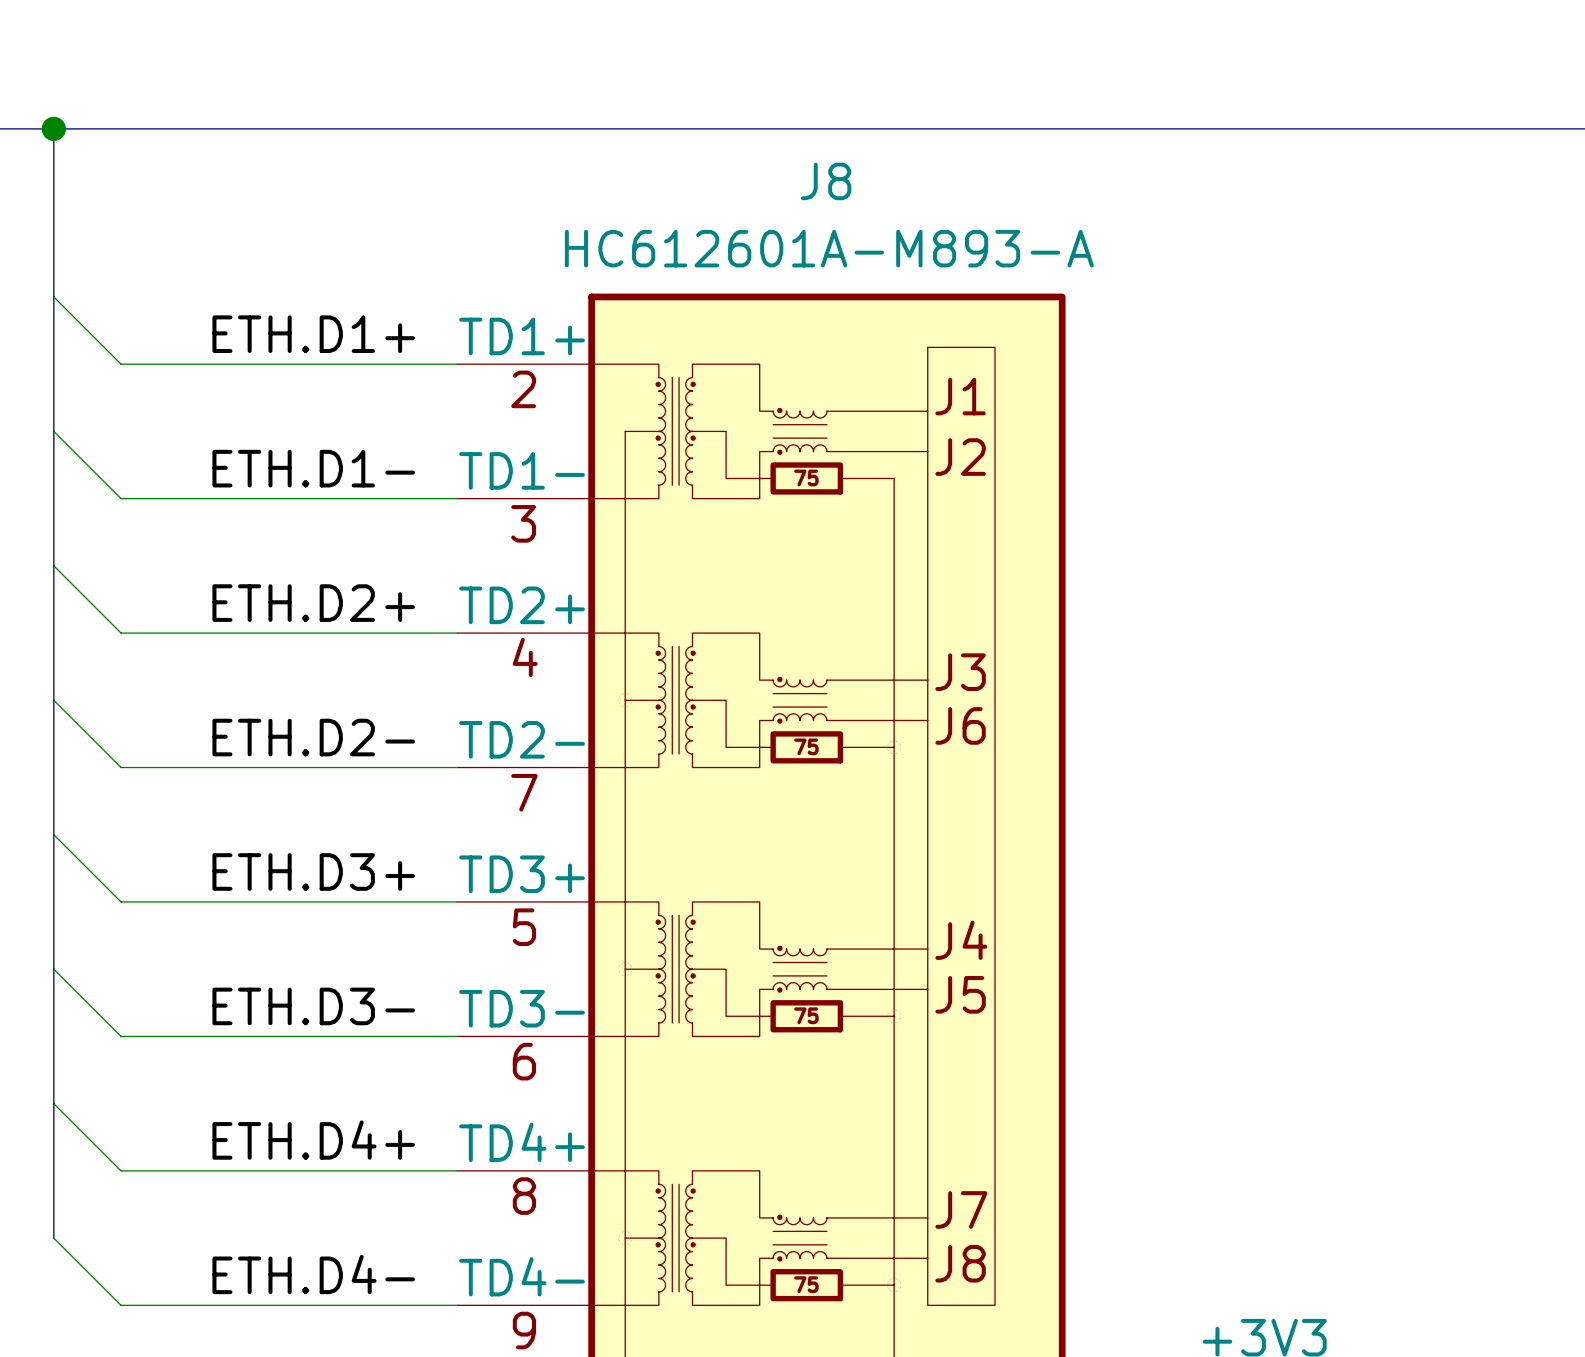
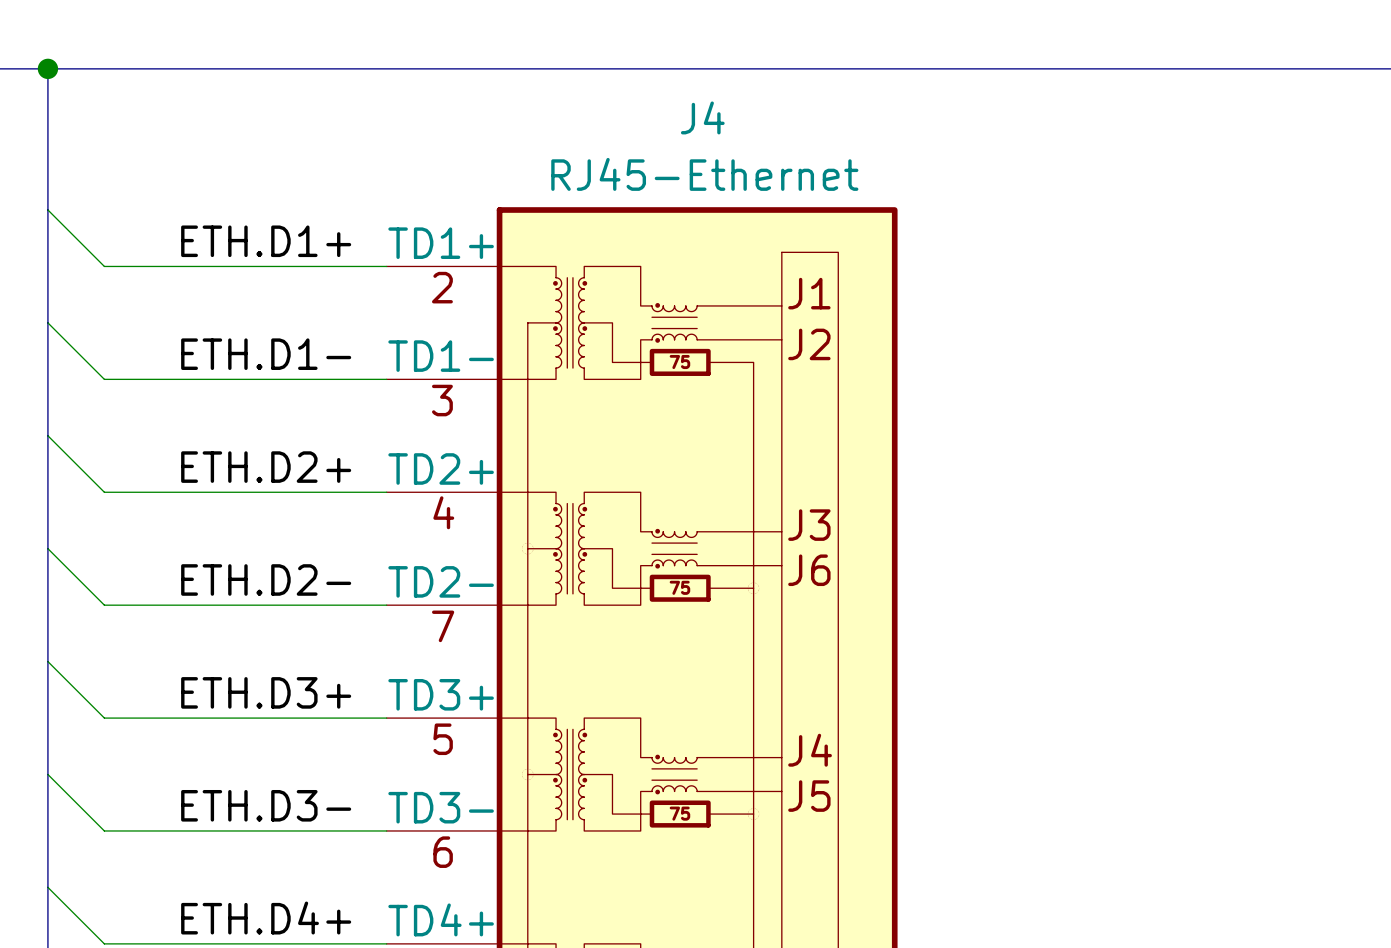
J8 name: J8 (826, 181) -> J4 (702, 117)
J8 text: HC612601A-M893-A (829, 248) -> none
J8 value: none -> RJ45-Ethernet (704, 174)

